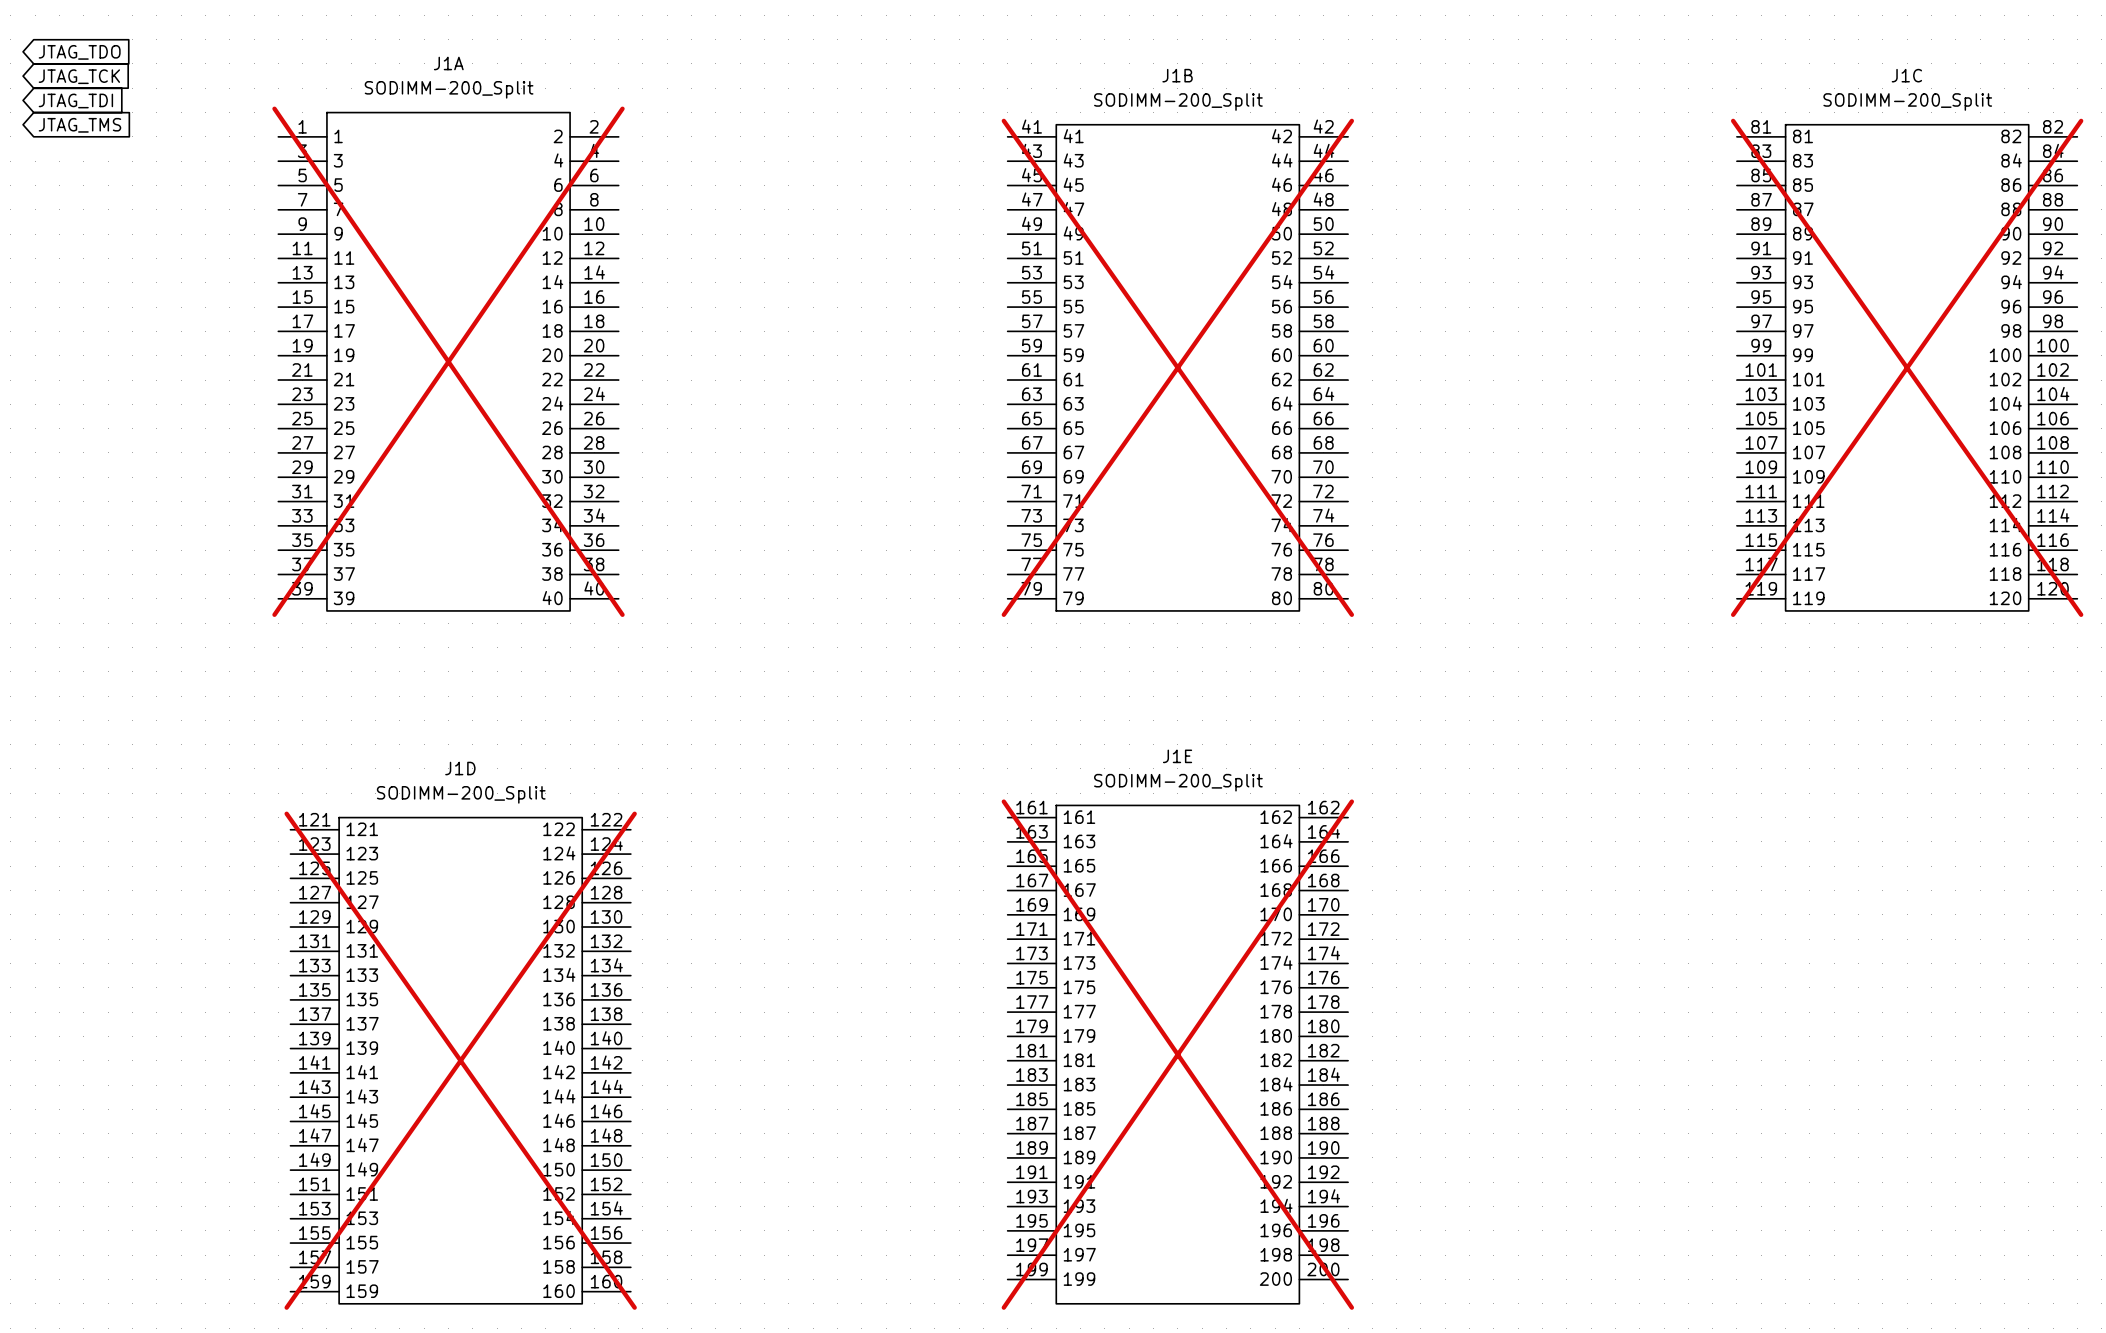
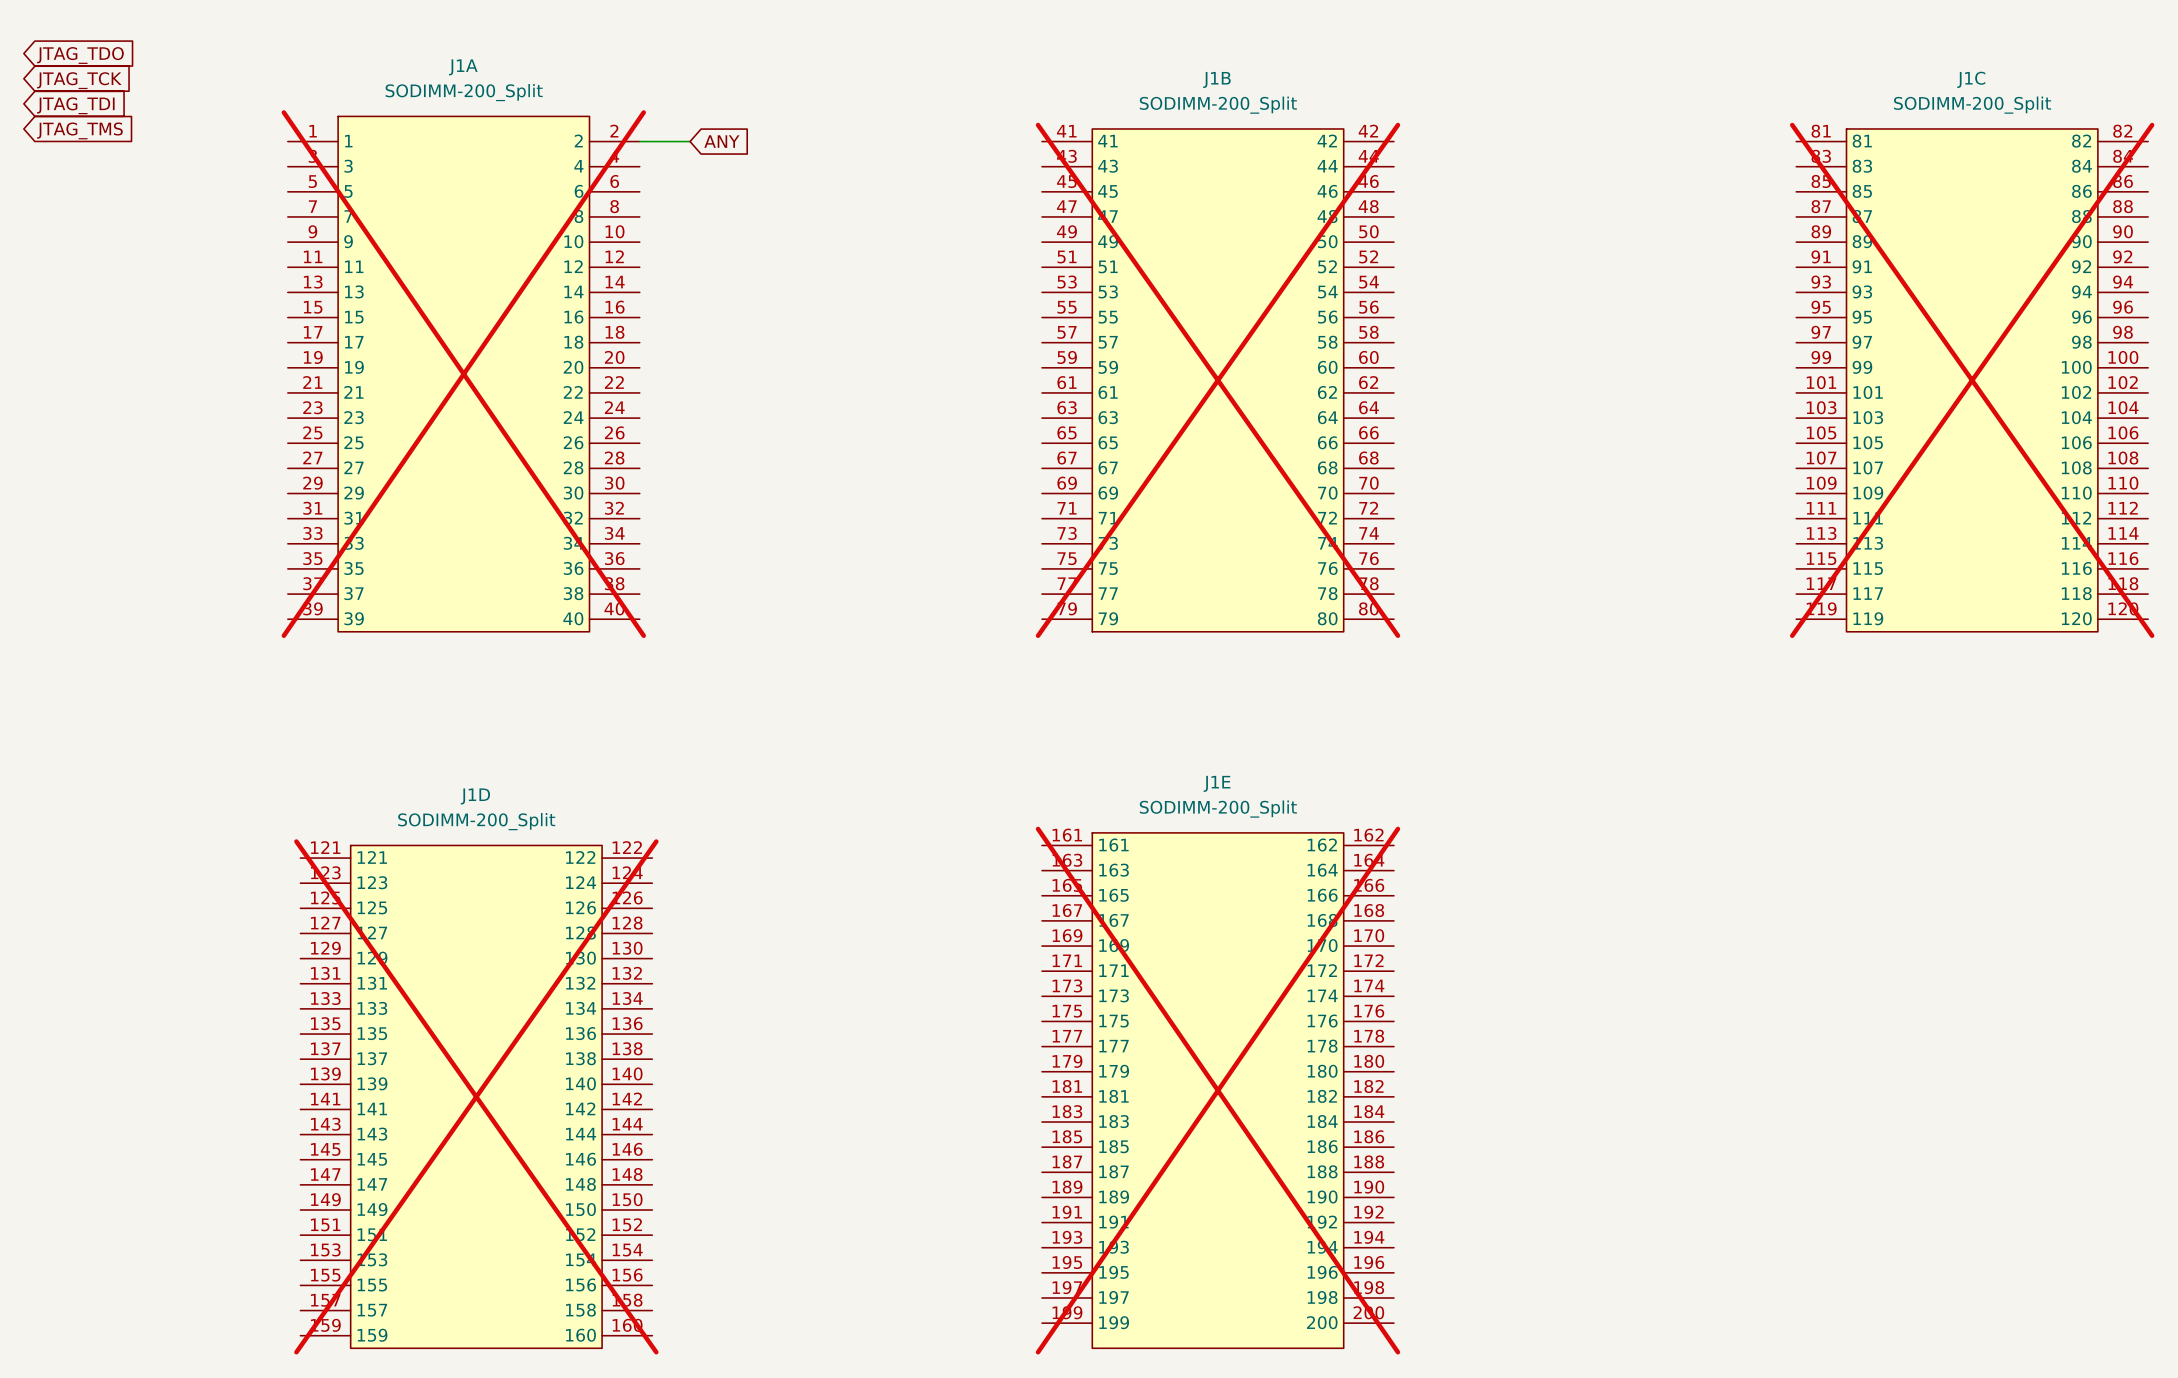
wire: none -> (639, 141) (690, 141)
global label: none -> ANY (721, 141)

